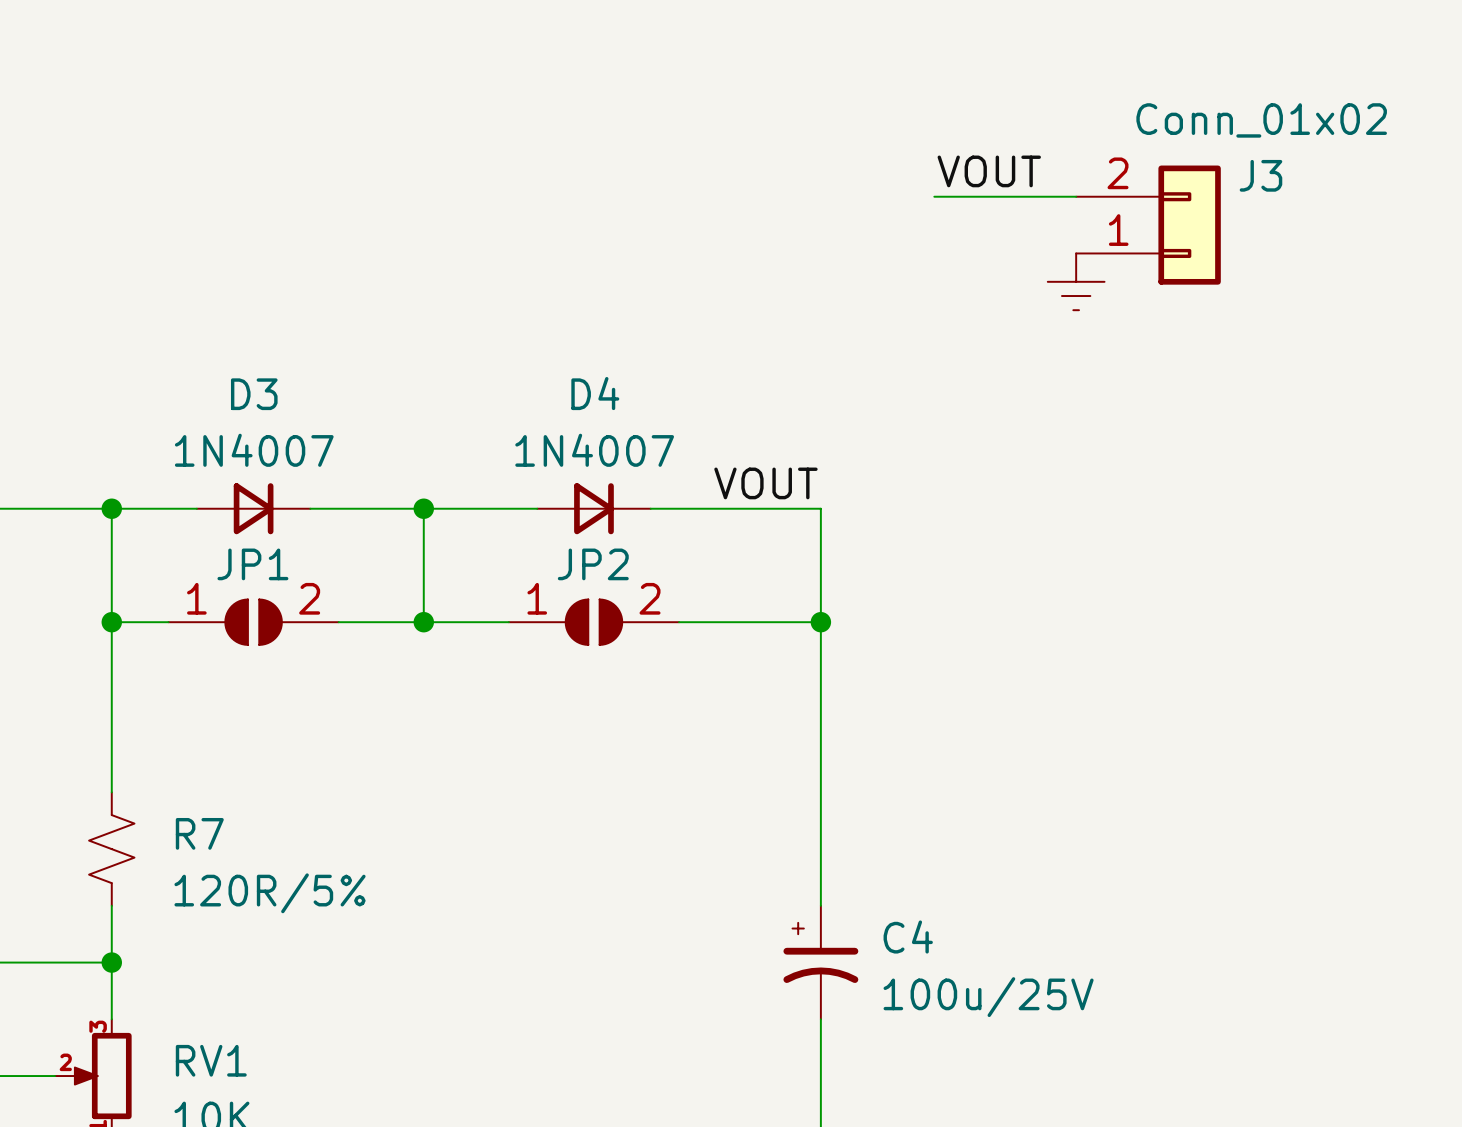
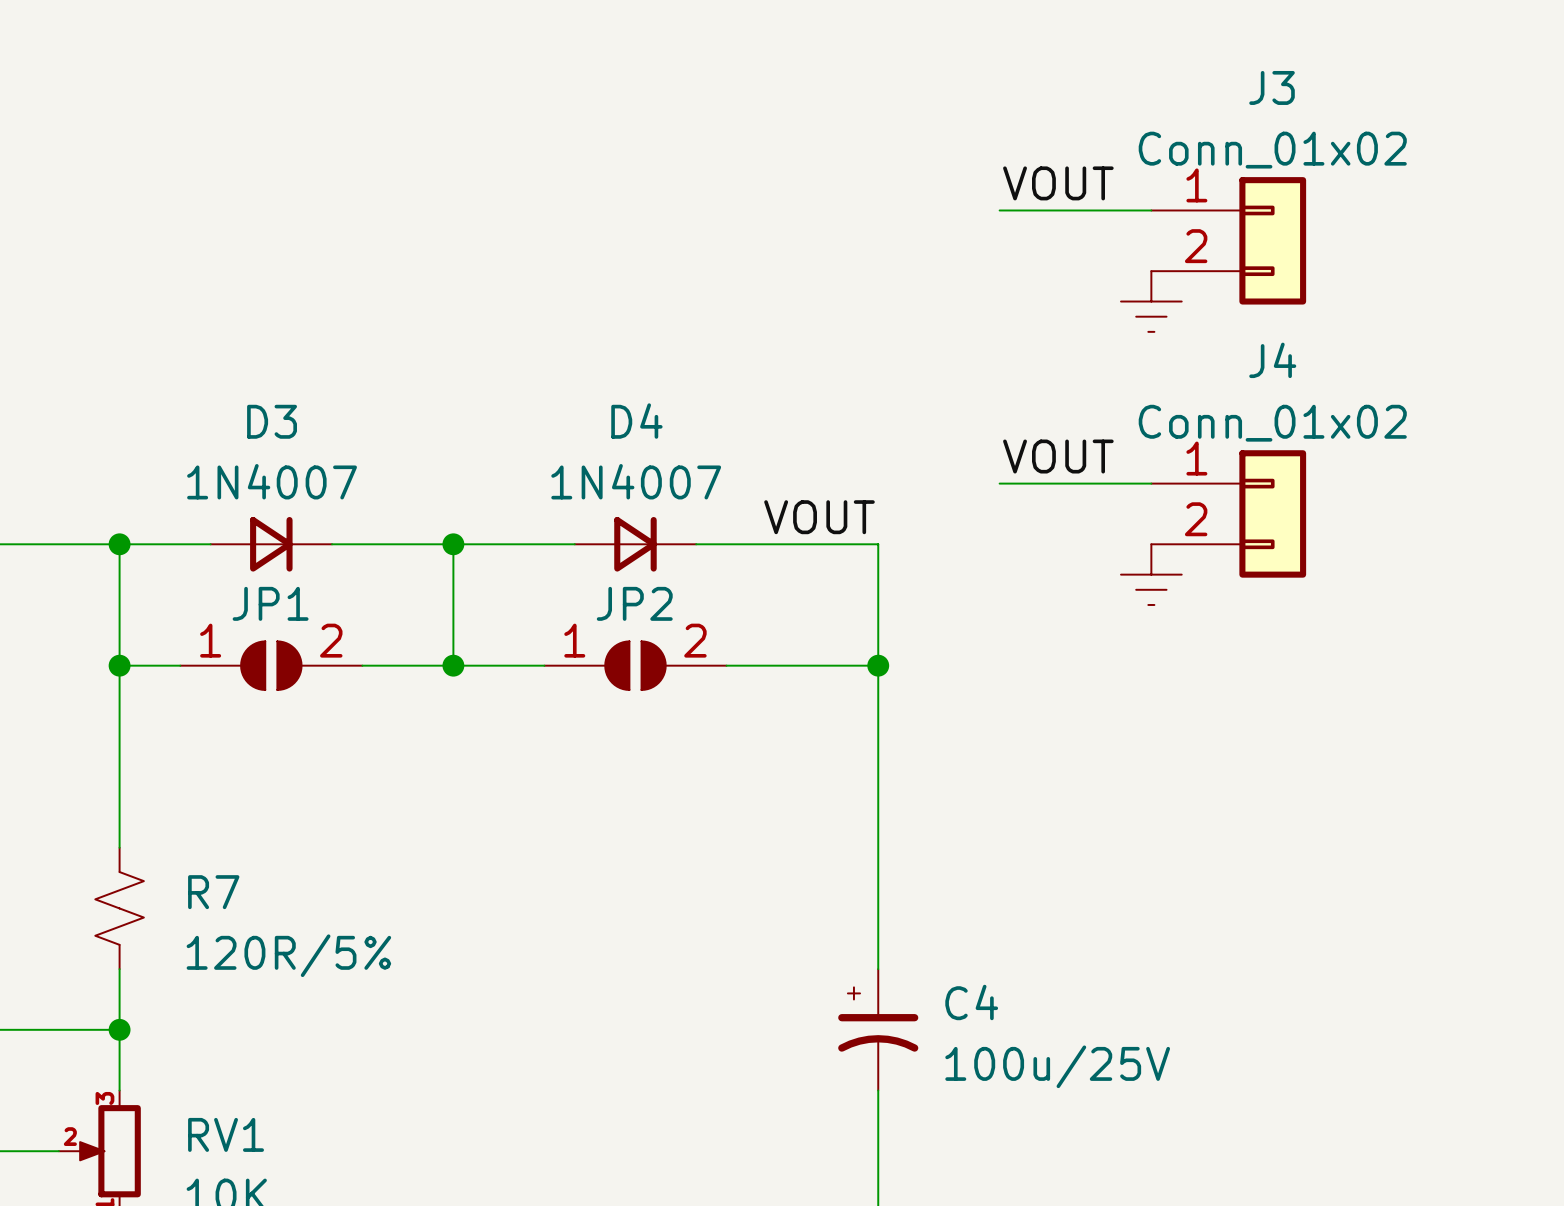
J3 value position: Conn_01x02 (1261, 120) -> Conn_01x02 (1272, 150)
J3 name position: J3 (1260, 175) -> J3 (1272, 87)
J3 flip: as is (1189, 225) -> up-down (1272, 240)
label: none -> VOUT (1058, 456)
wire: none -> (999, 483) (1151, 483)
J4: none -> Conn_01x02 (1228, 513)
power symbol: none -> (1151, 574)

